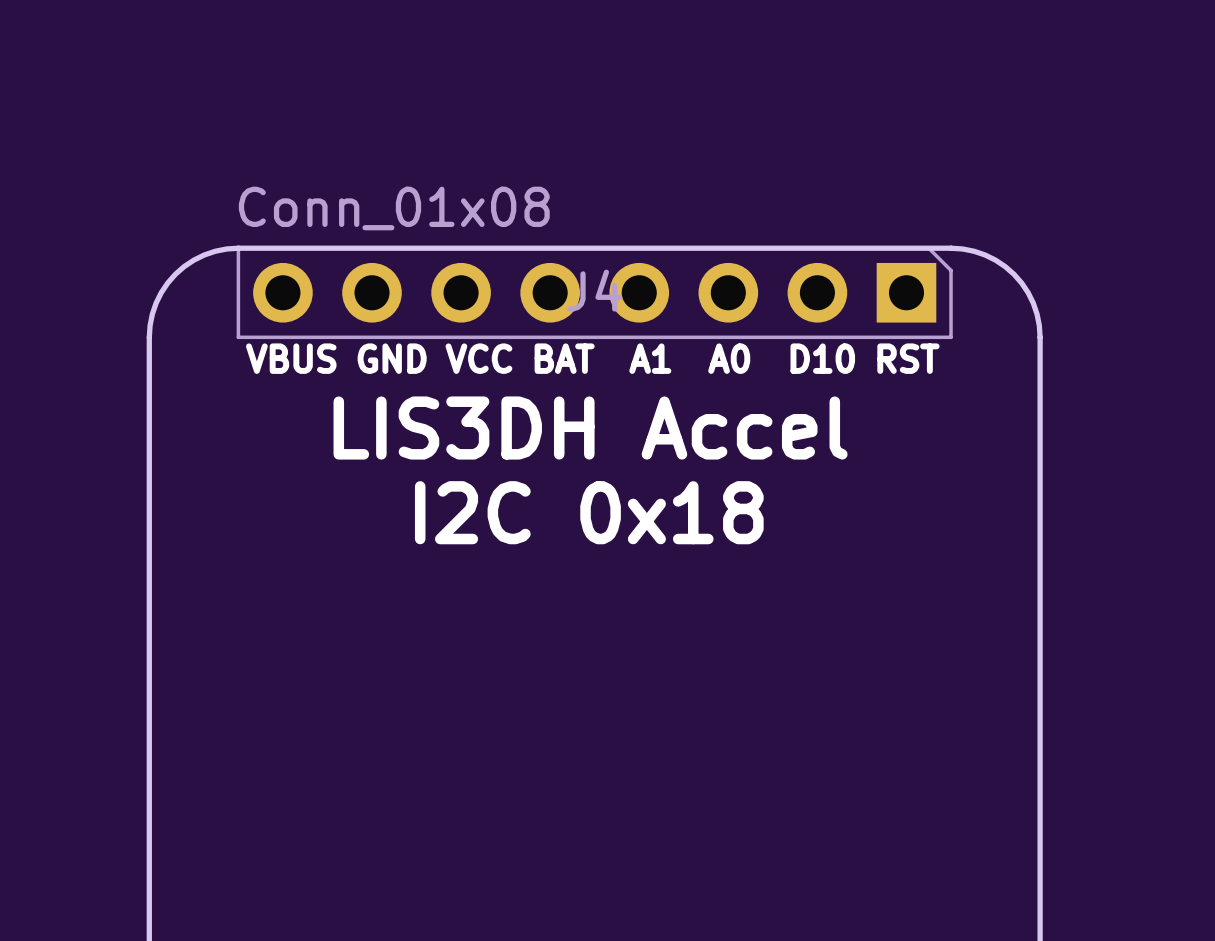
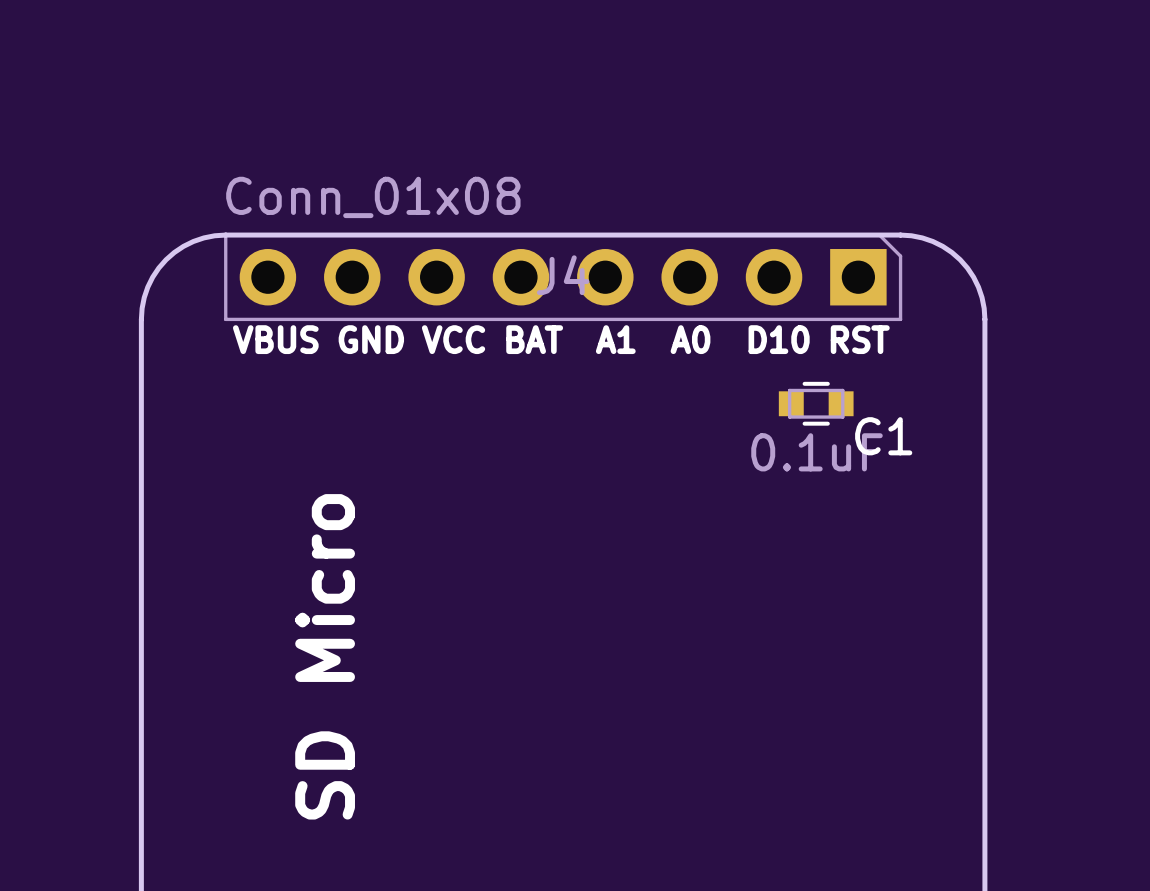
C1: none -> 0.1uF (816, 403)
text: LIS3DH Accel (590, 428) -> none
text: I2C 0x18 (589, 512) -> none
text: none -> SD Micro (325, 656)

